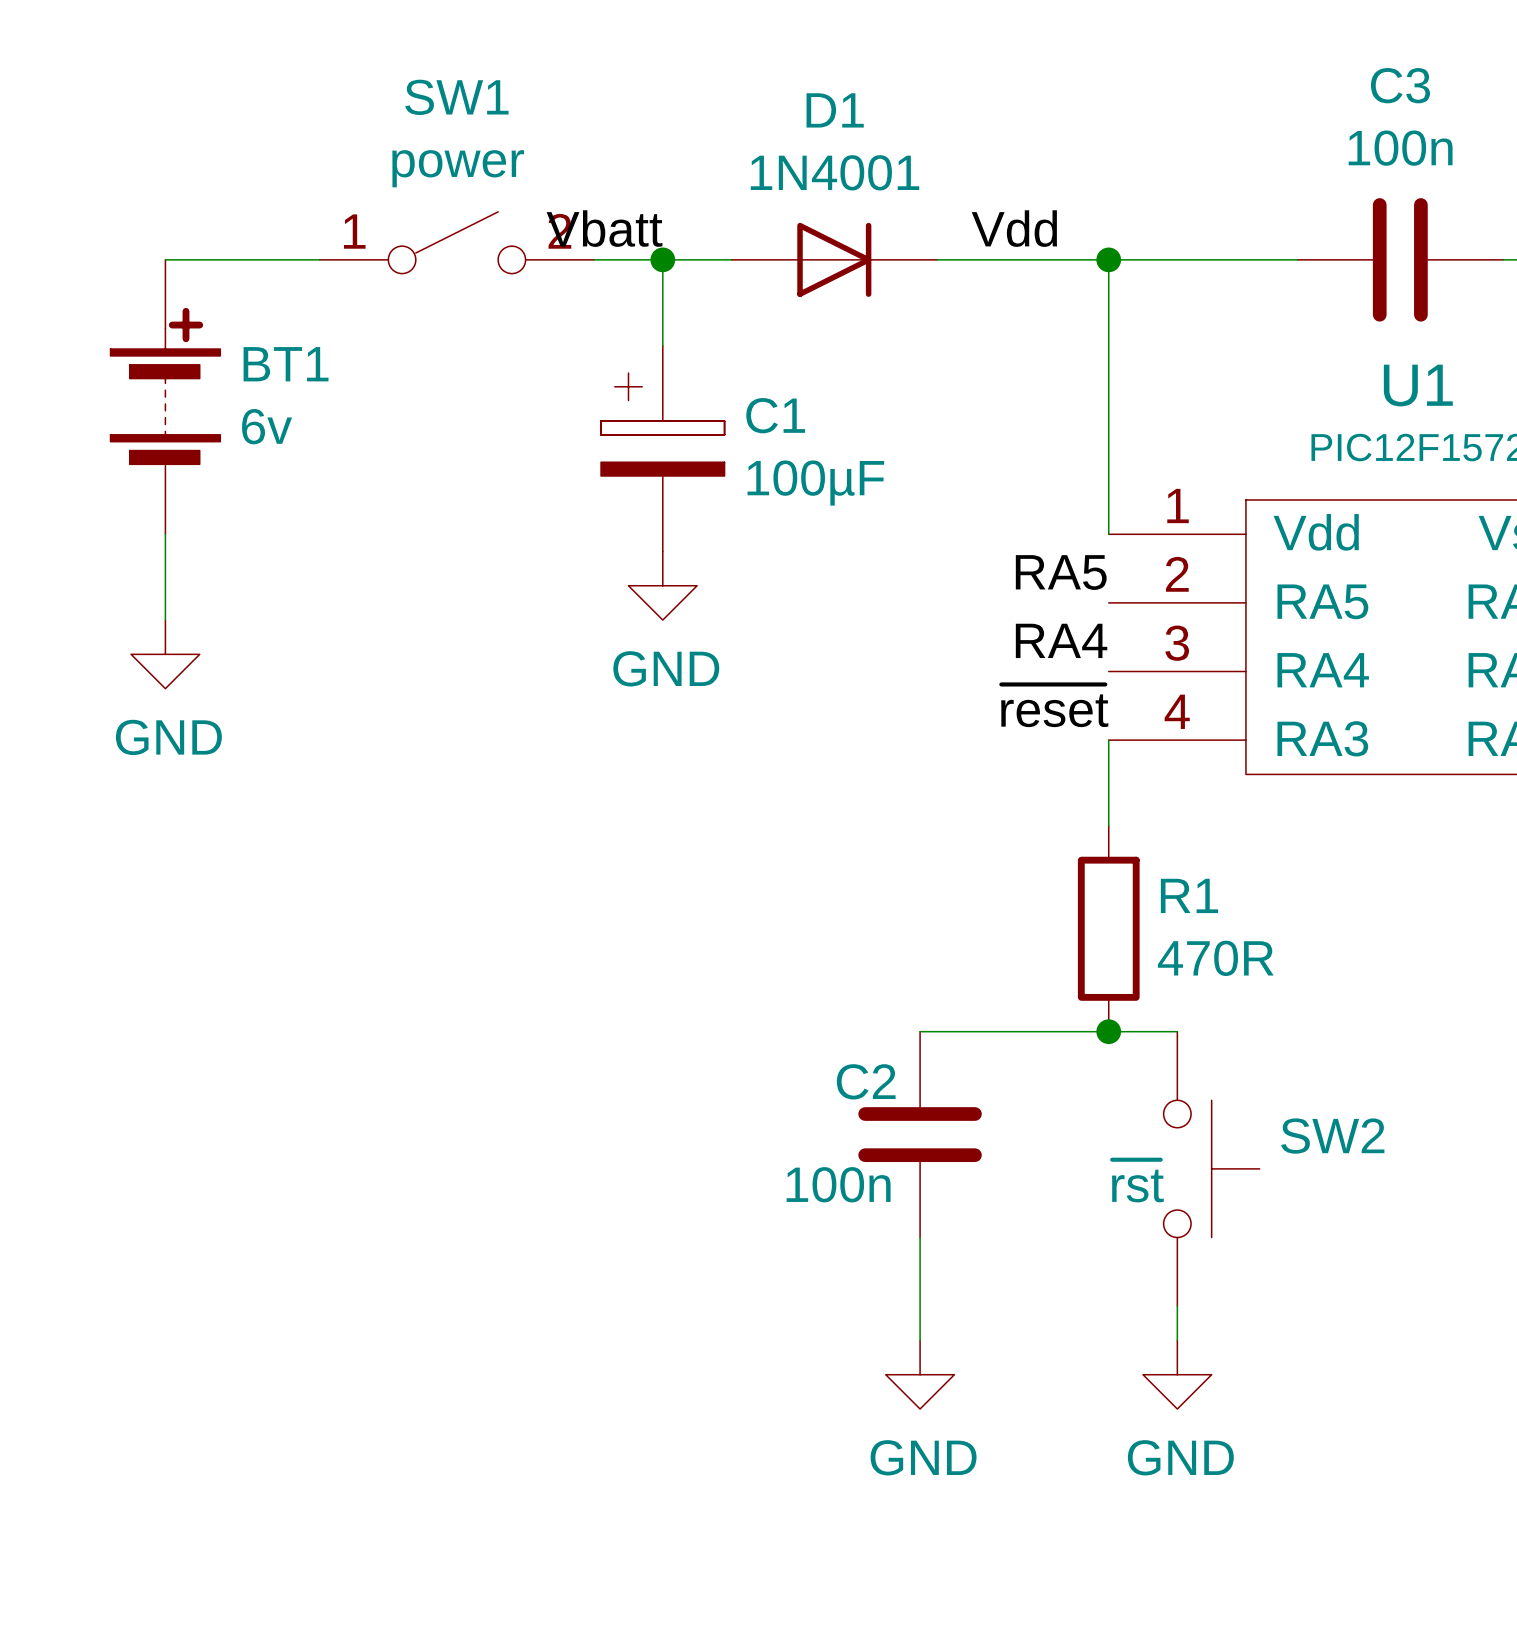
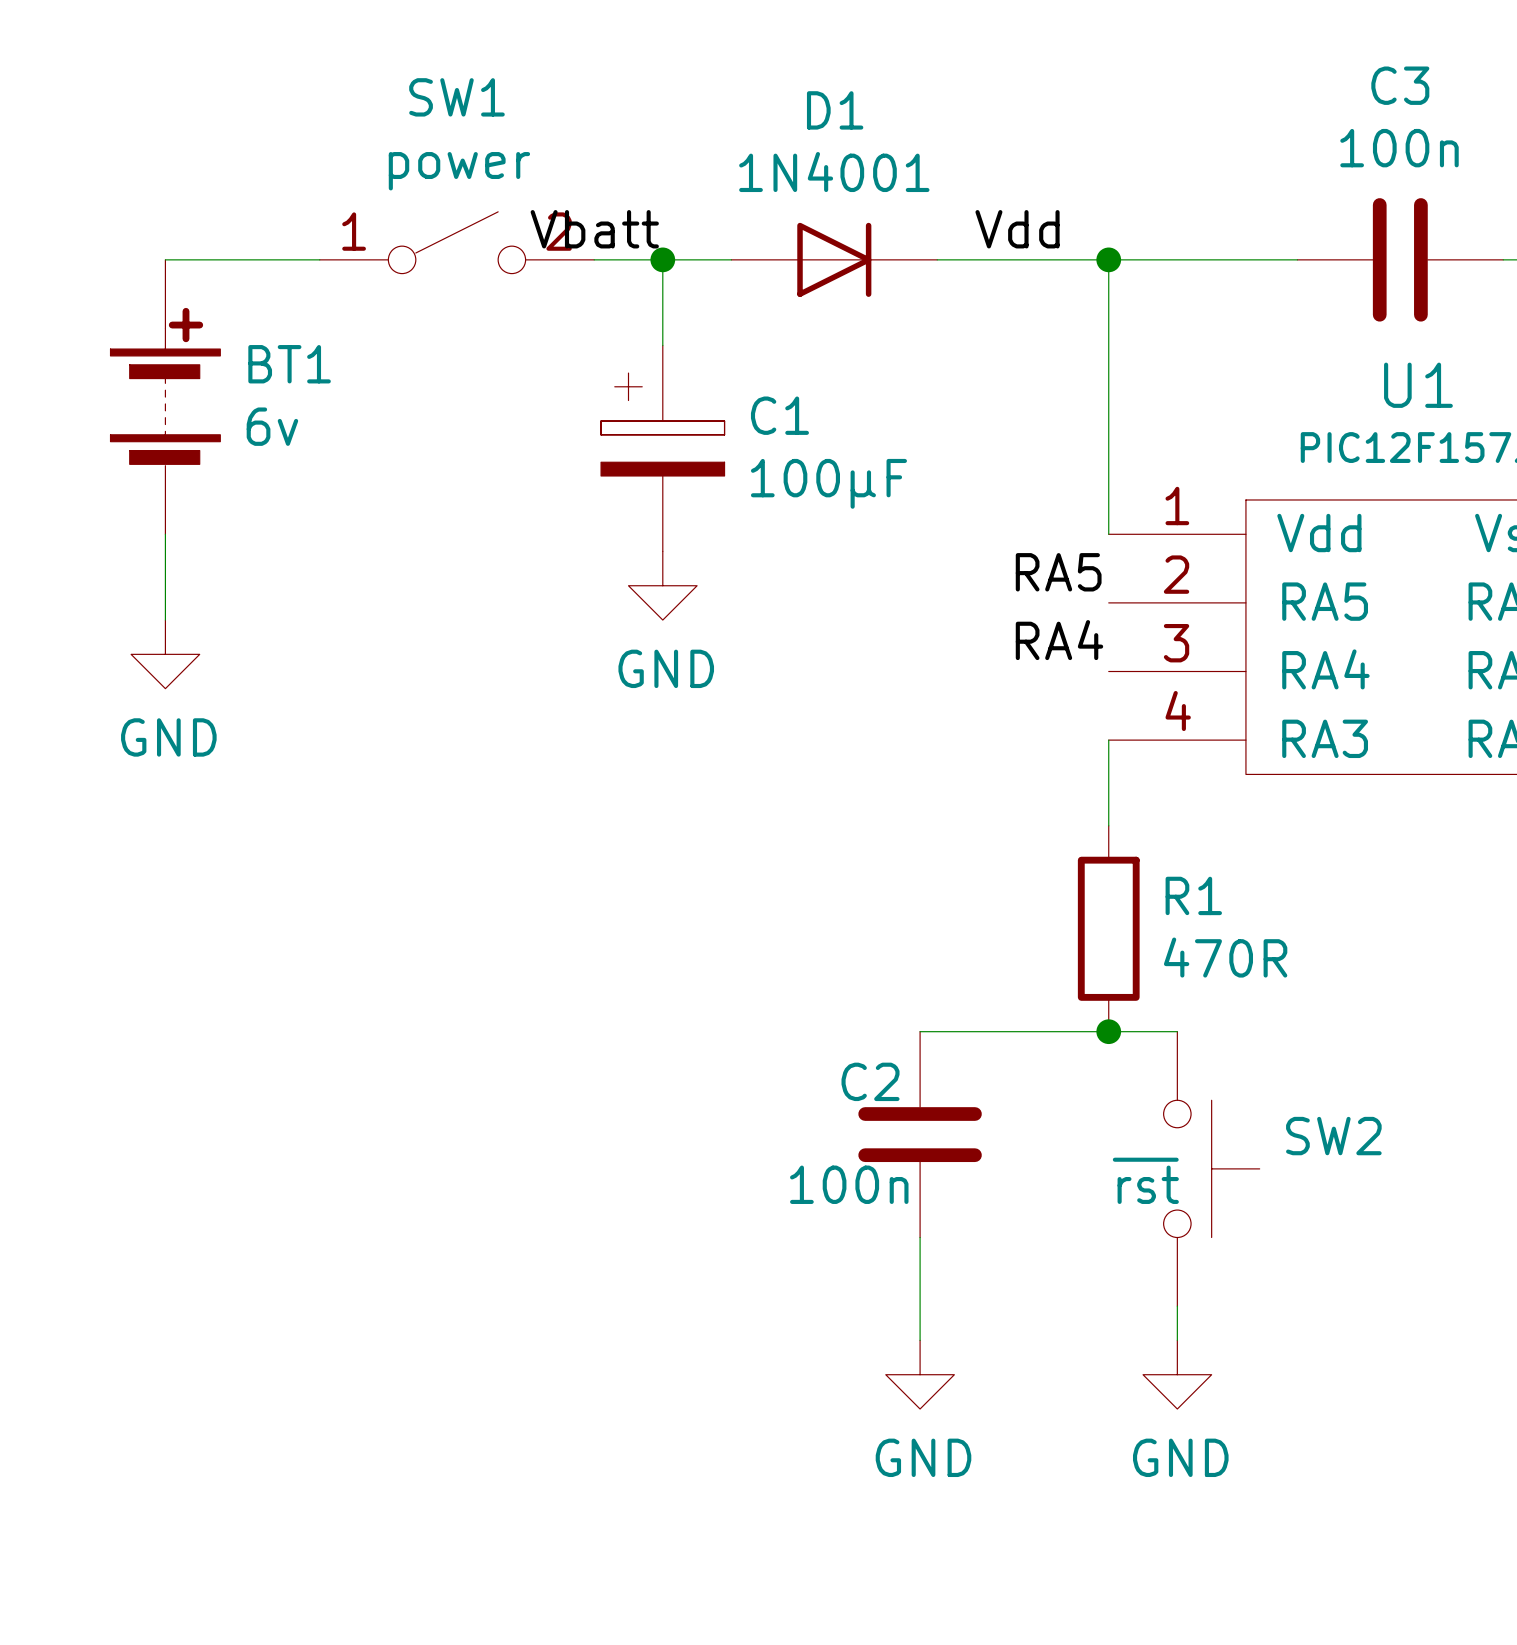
label: ~{reset} (1054, 705) -> none

